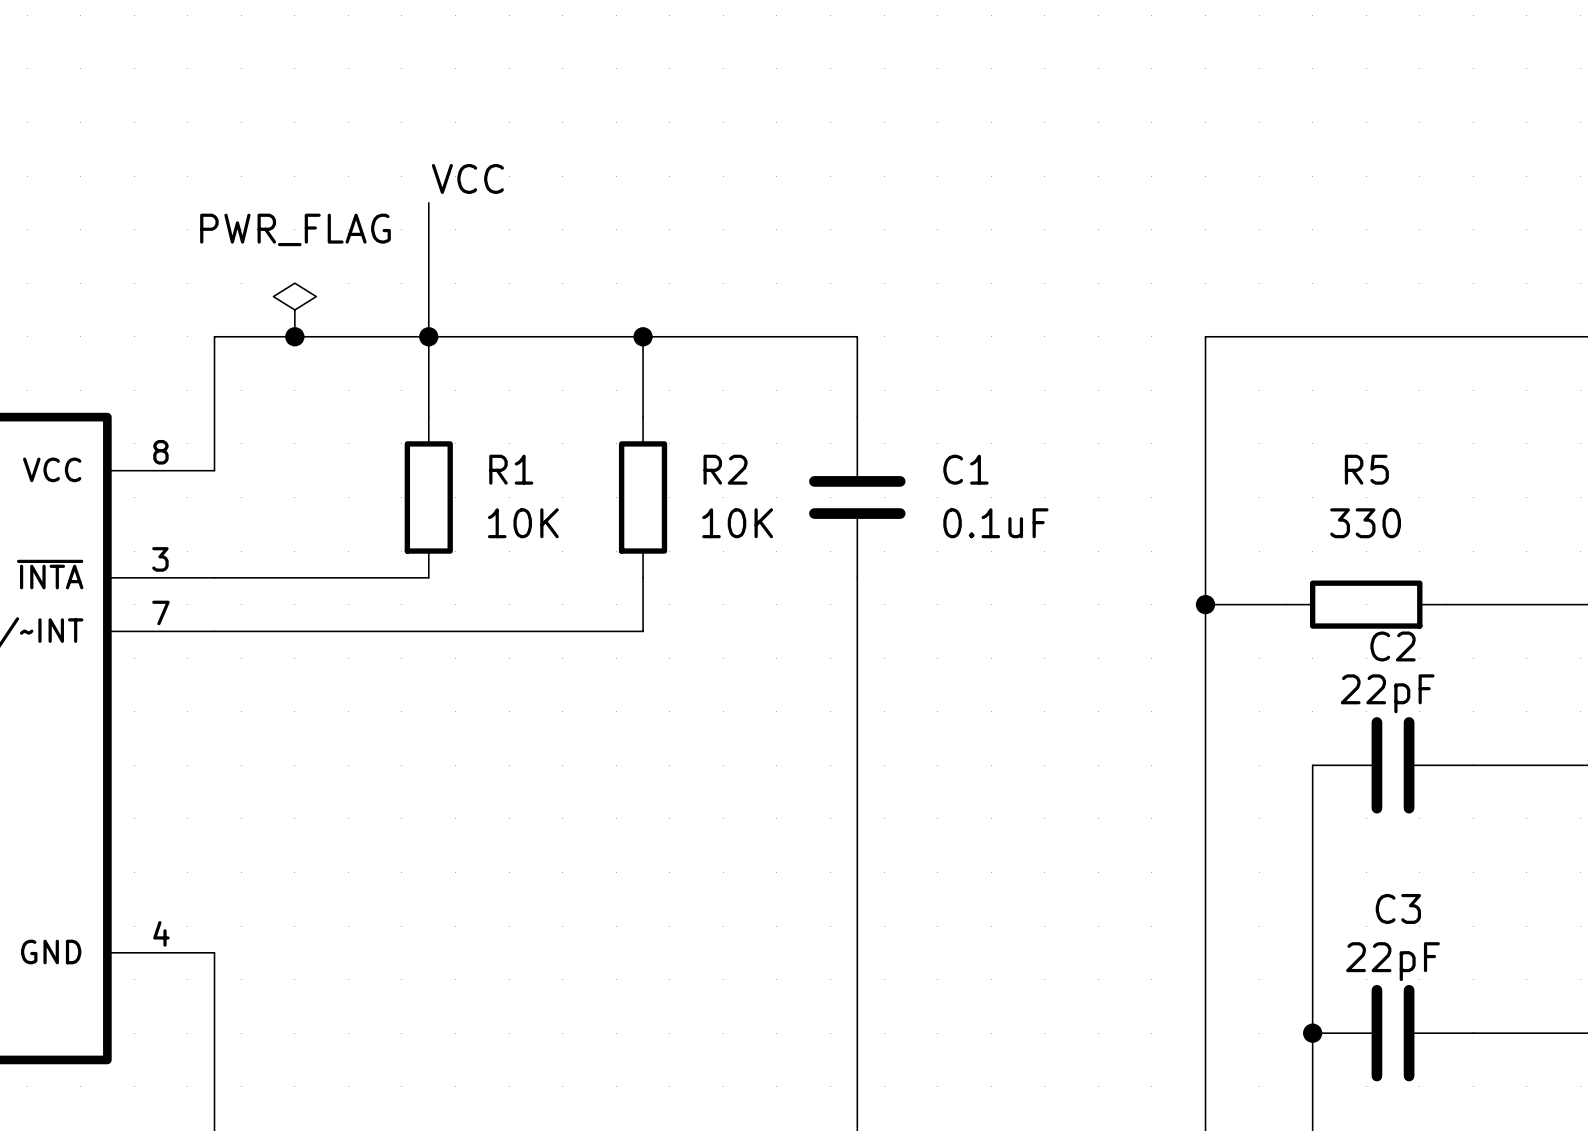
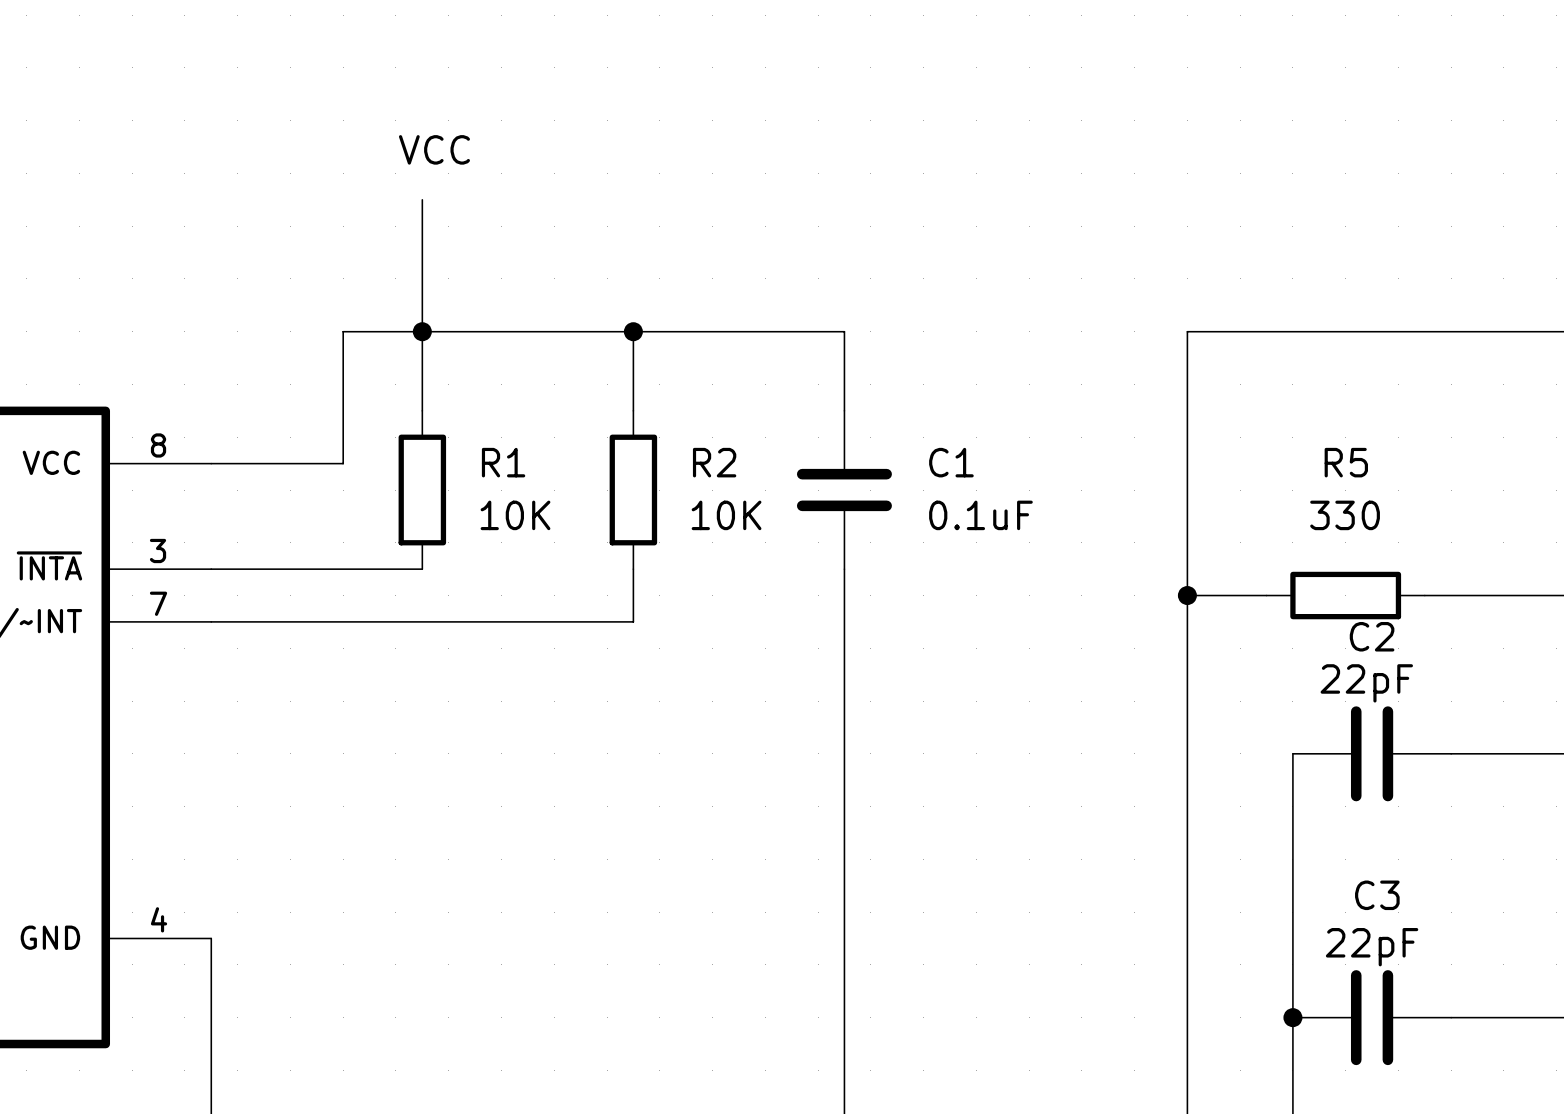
label position: VCC (467, 178) -> VCC (434, 149)
power symbol: PWR_FLAG (294, 309) -> none
junction: (294, 336) -> none
wire: (348, 336) (214, 336) (214, 470) -> (343, 331) (343, 463) (211, 463)

